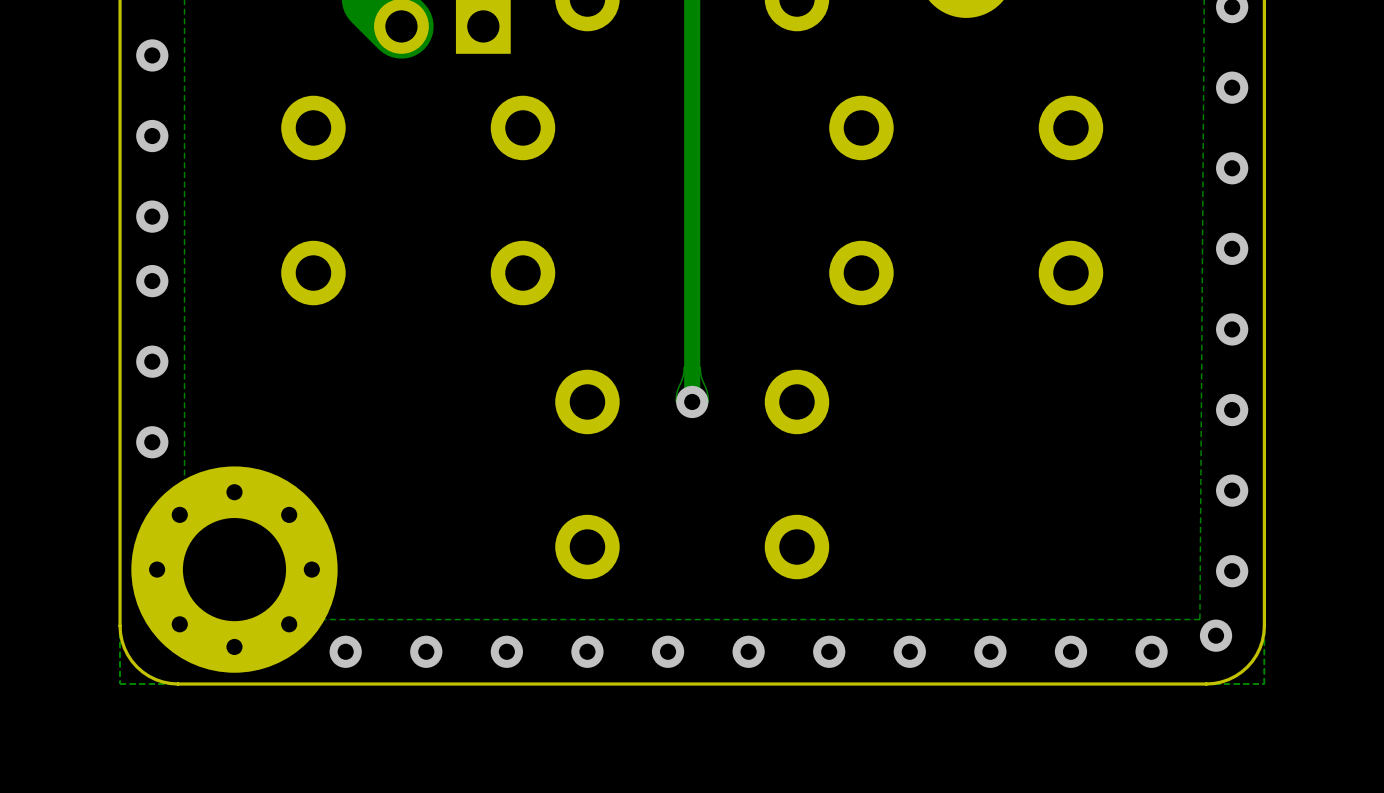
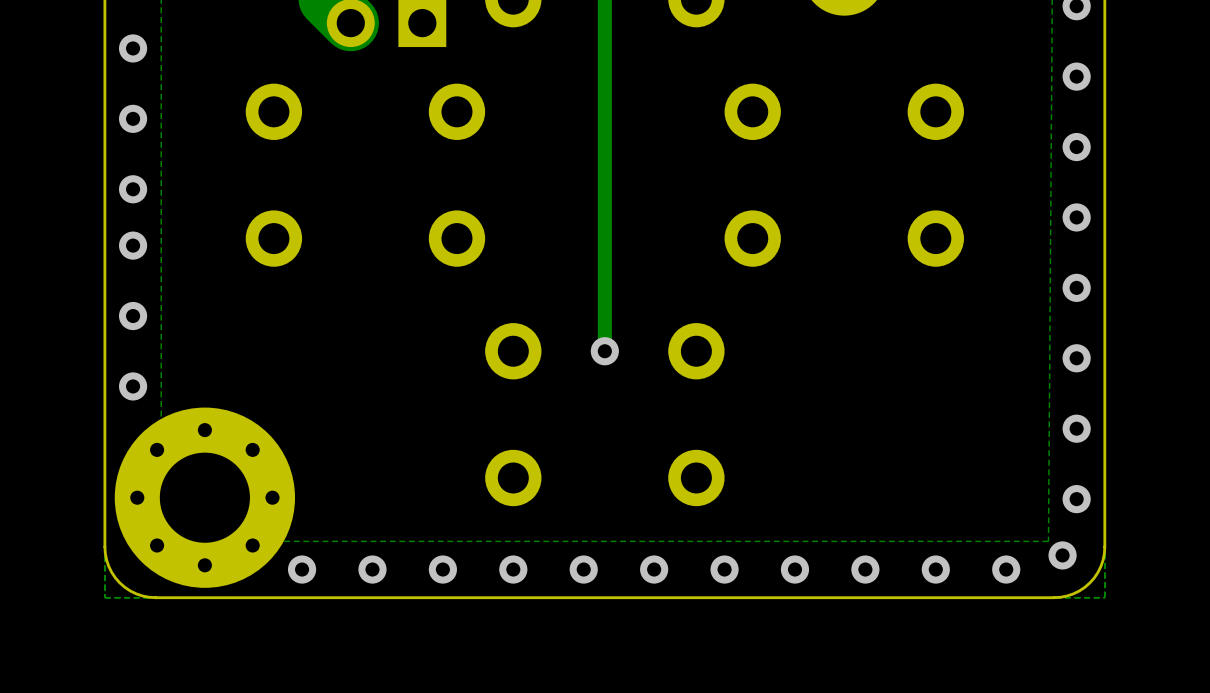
zone outline: (700, 366) (708, 401) (692, 410) (676, 401) (676, 393) (682, 378) (684, 366) (700, 366) -> none

